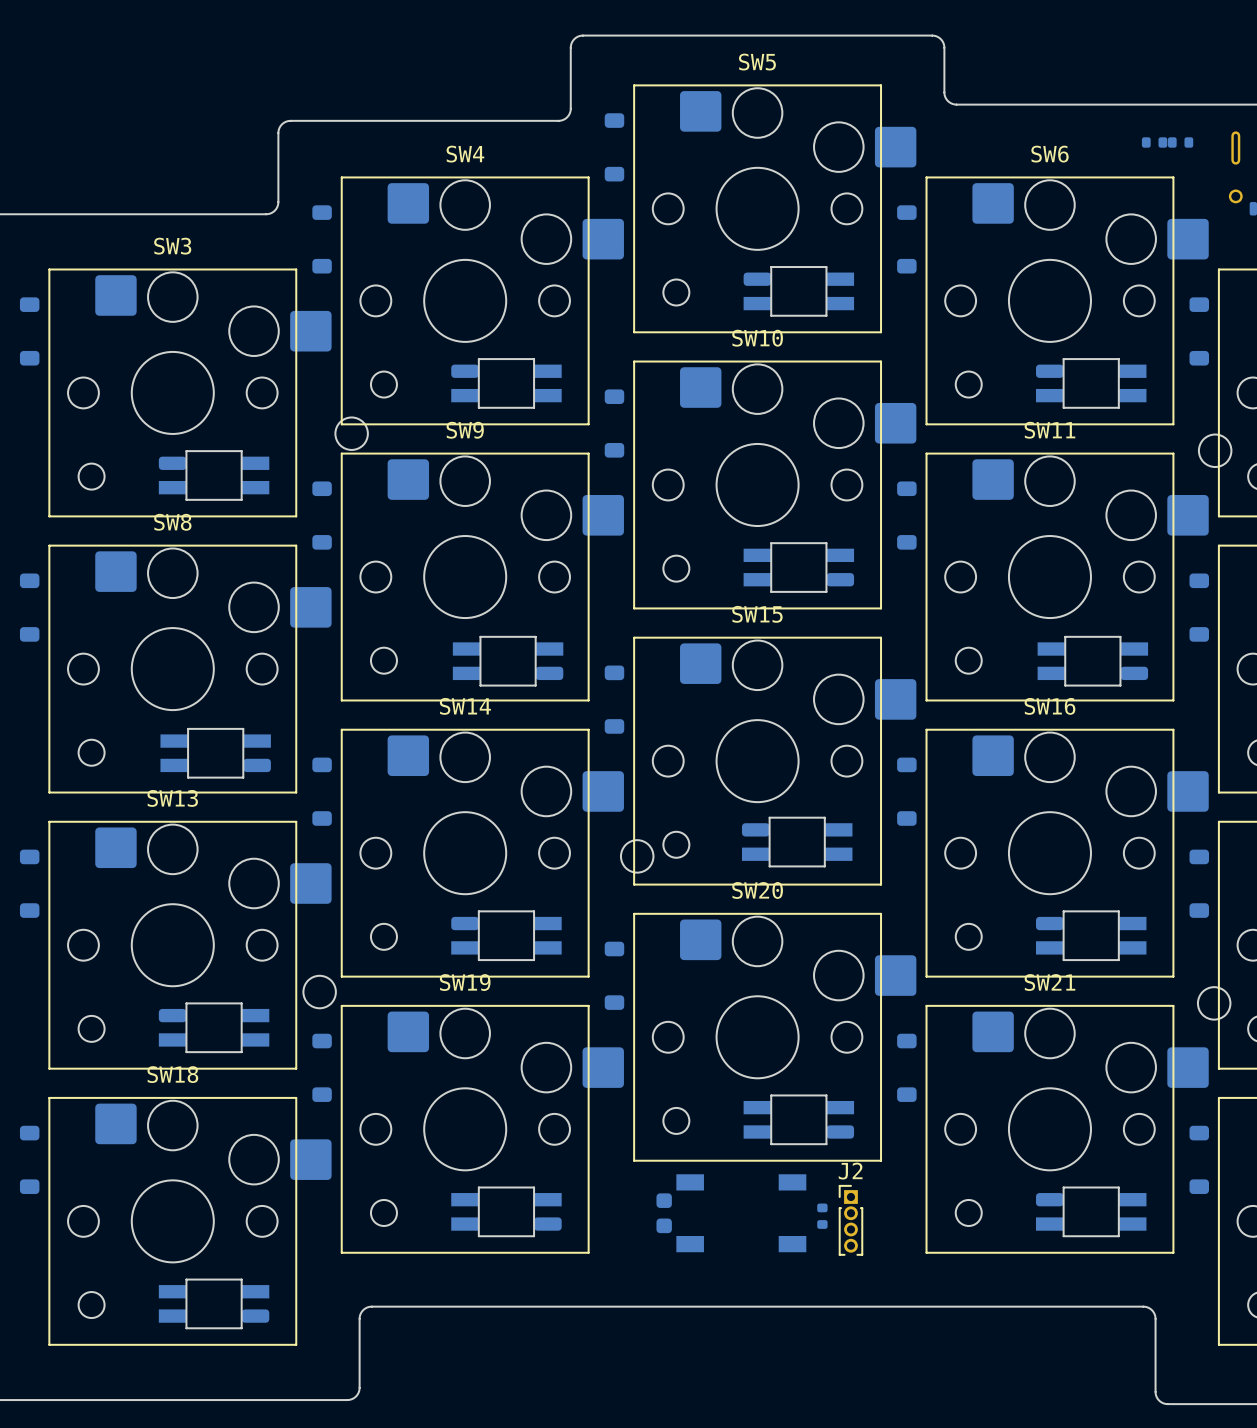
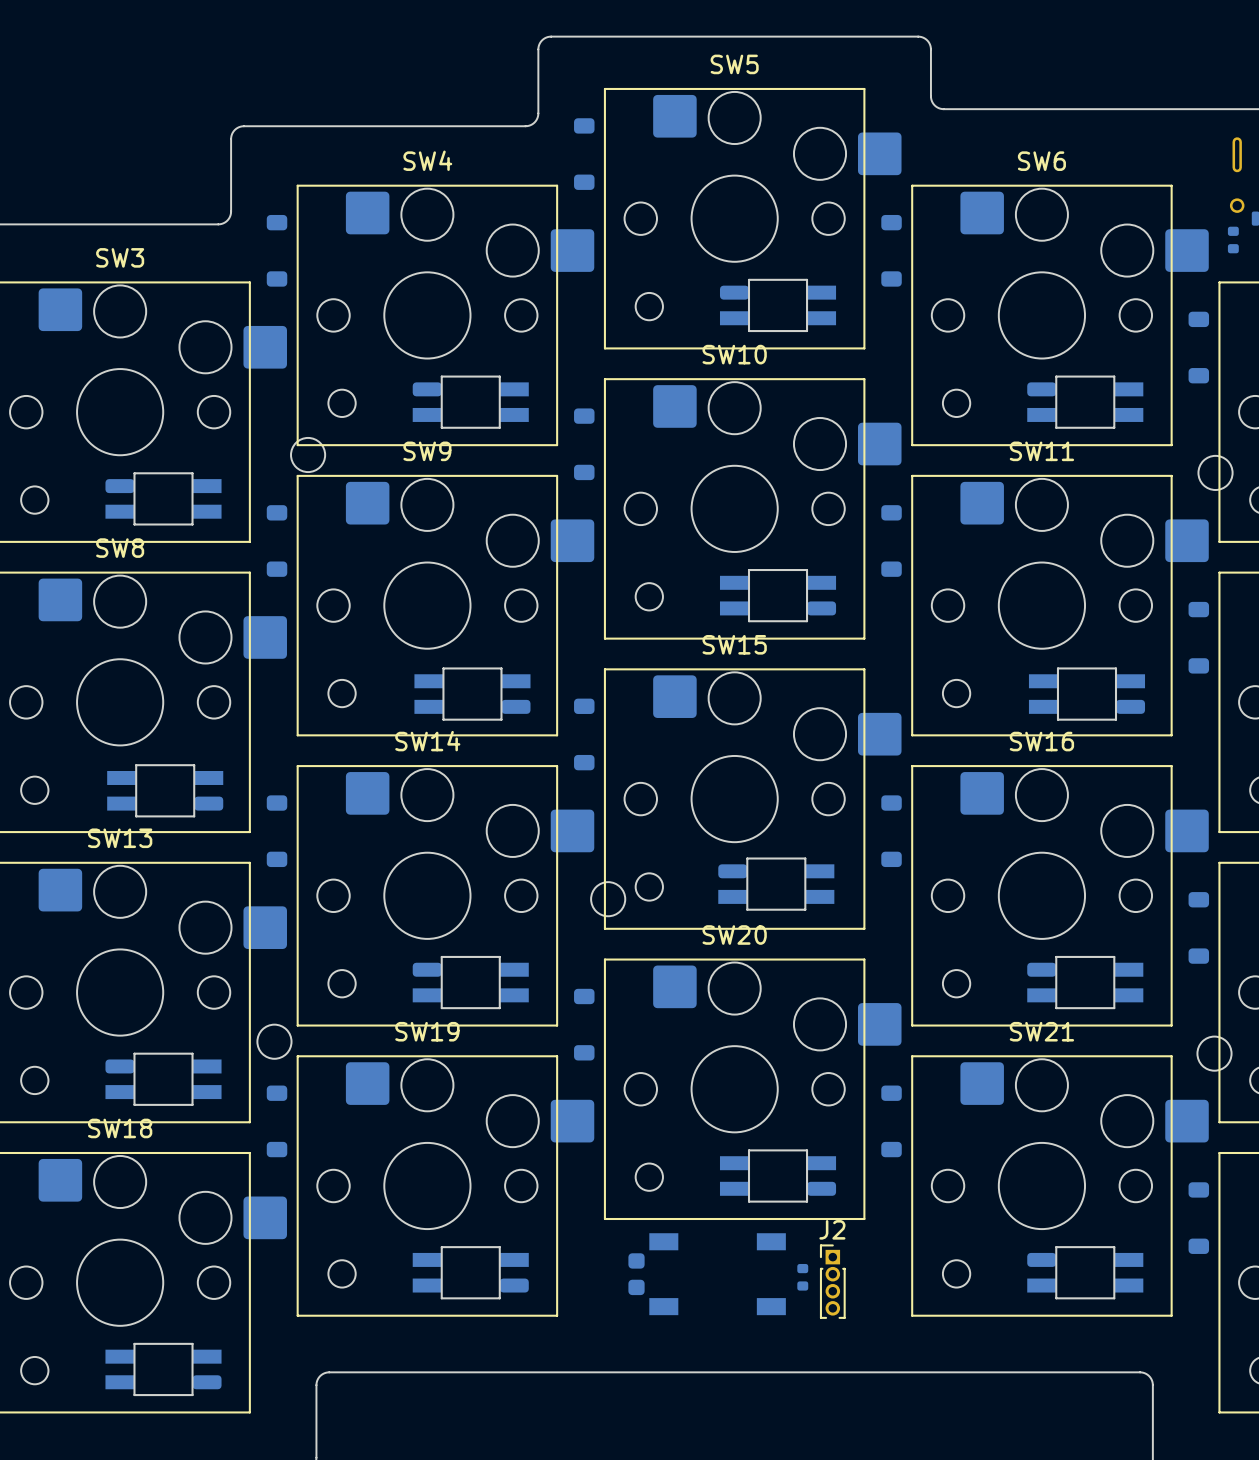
part: (1154, 142) -> none
part: (1180, 142) -> none
part: none -> (1233, 240)

